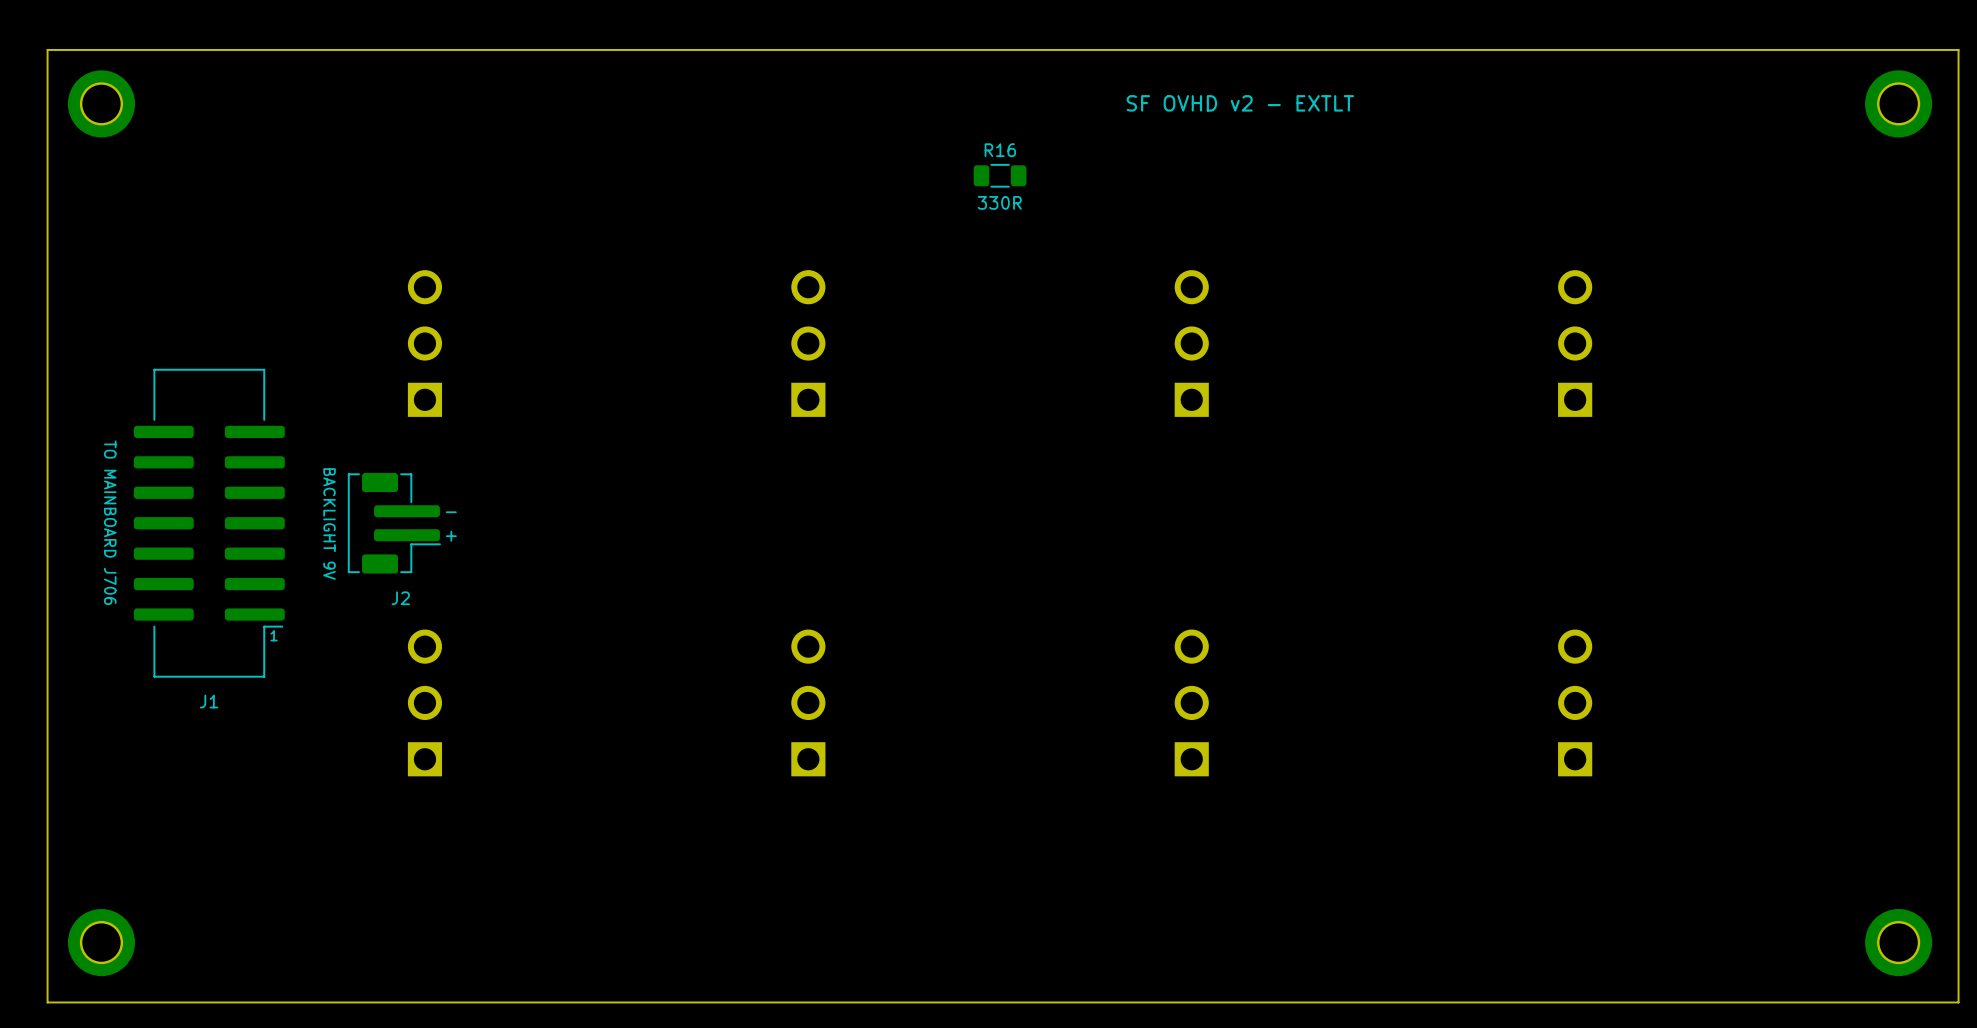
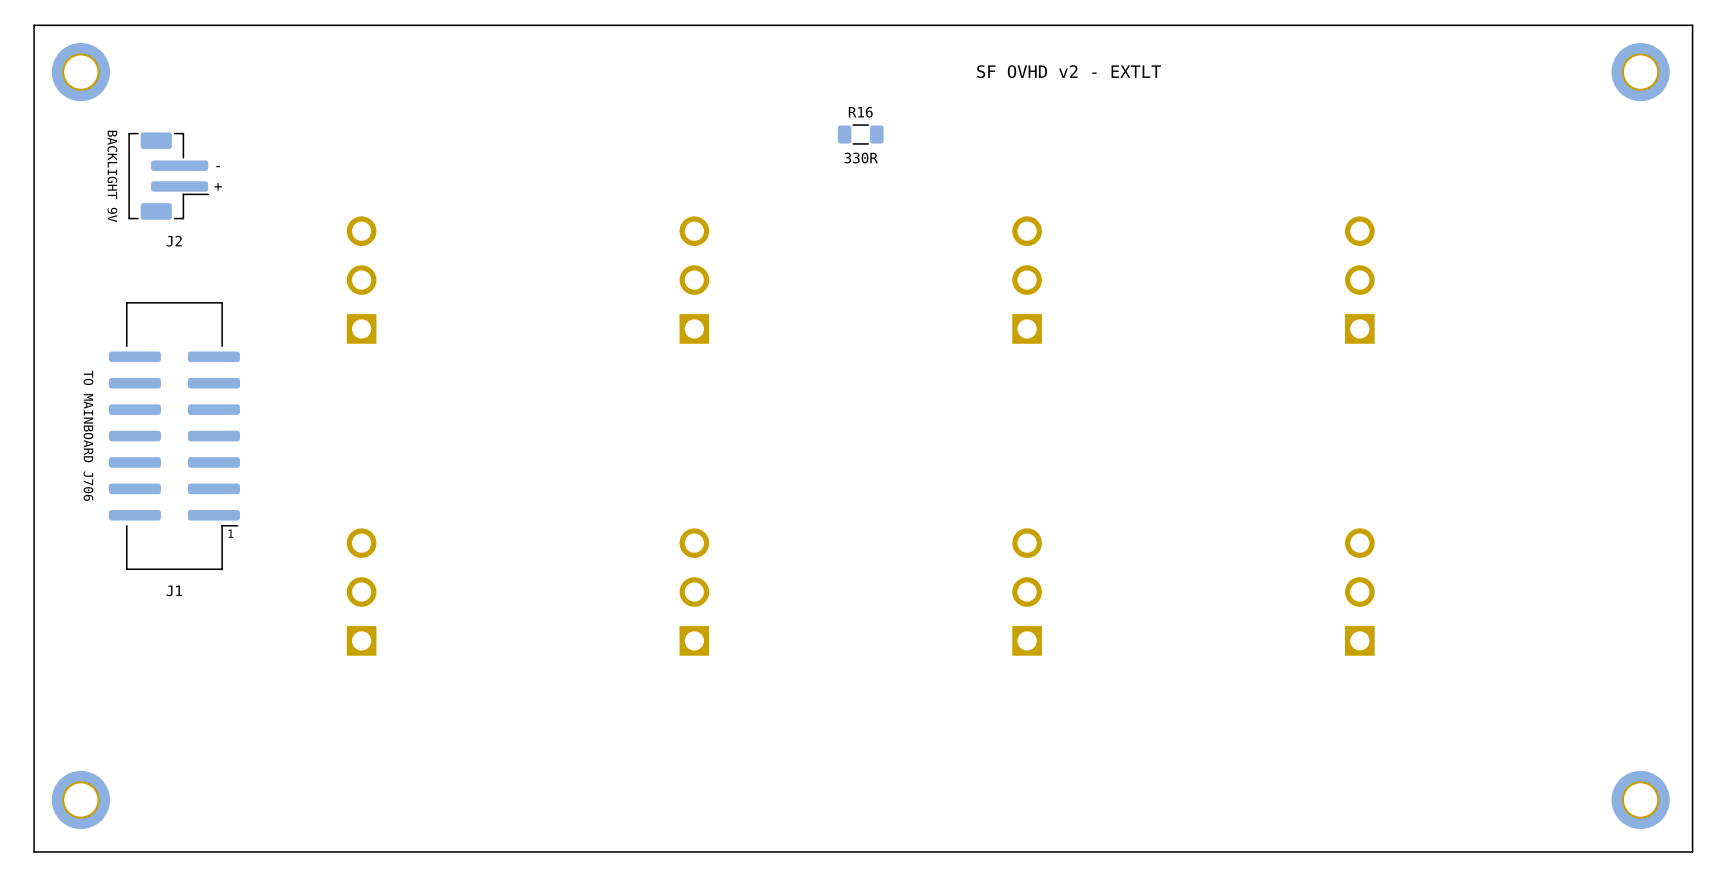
J2 position: (394, 523) -> (168, 176)

